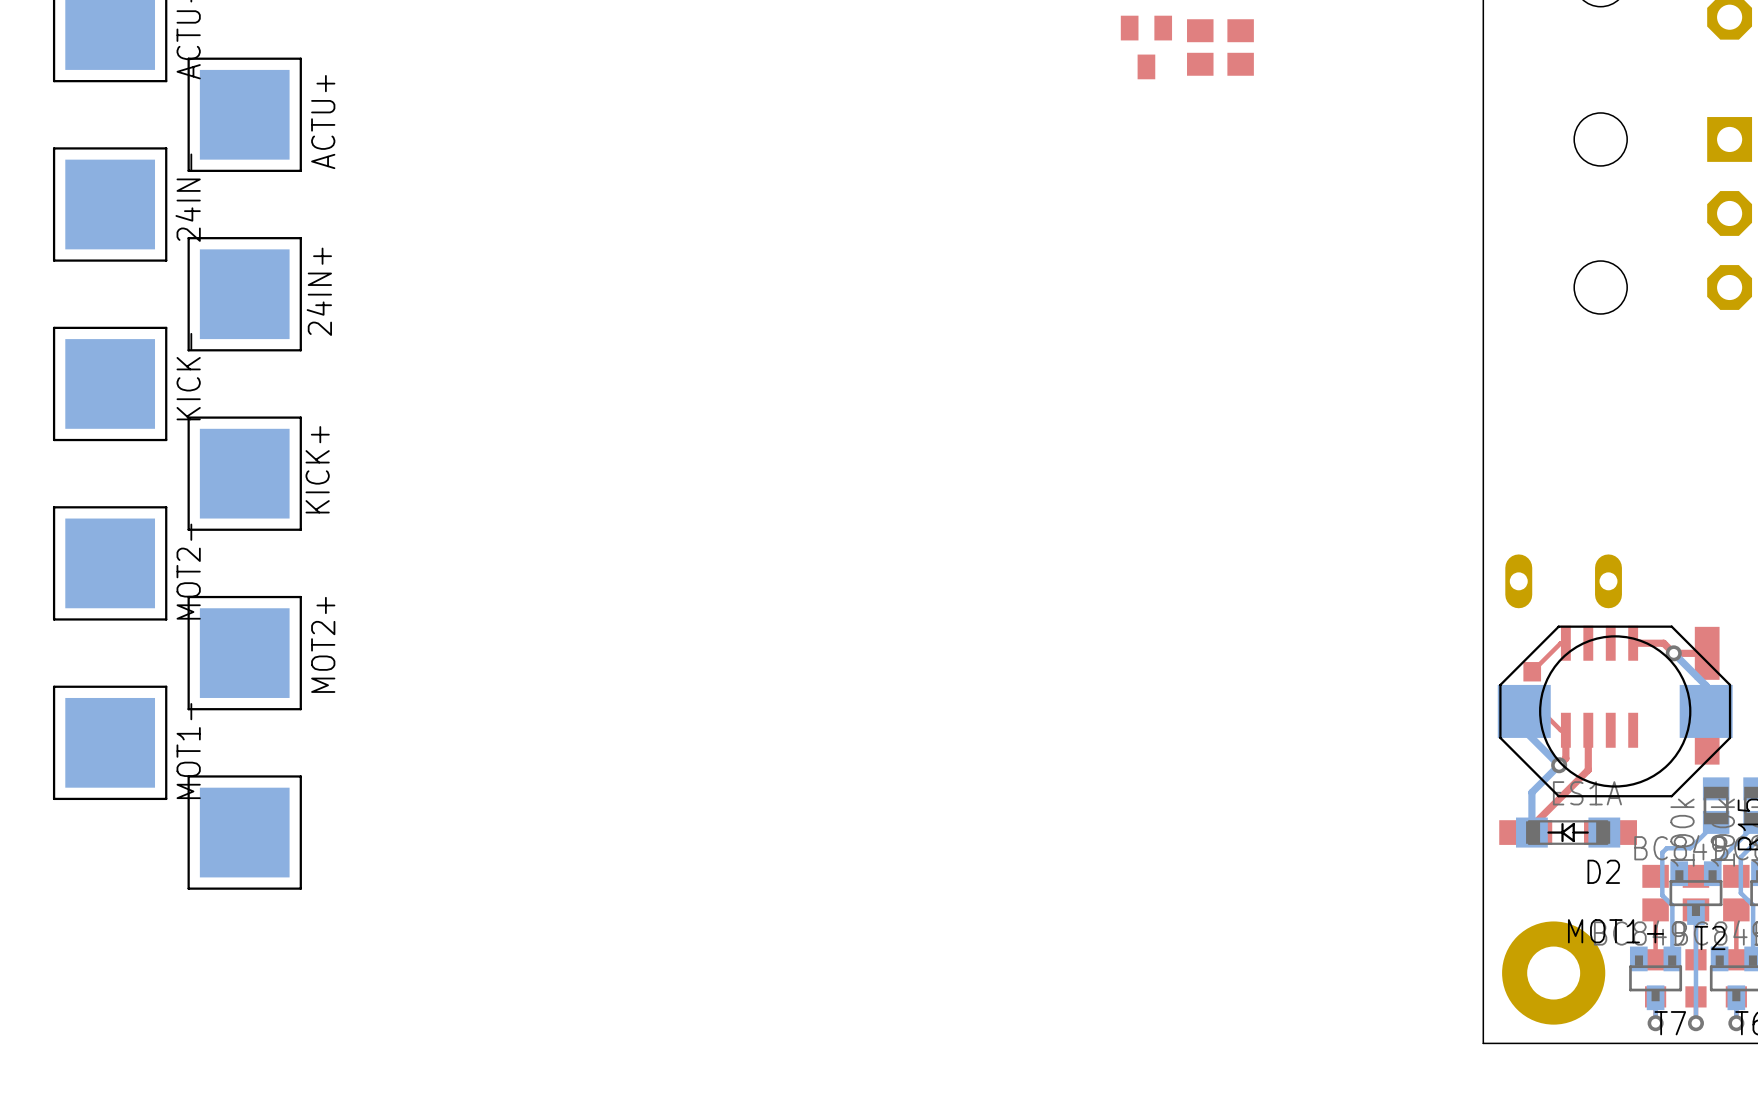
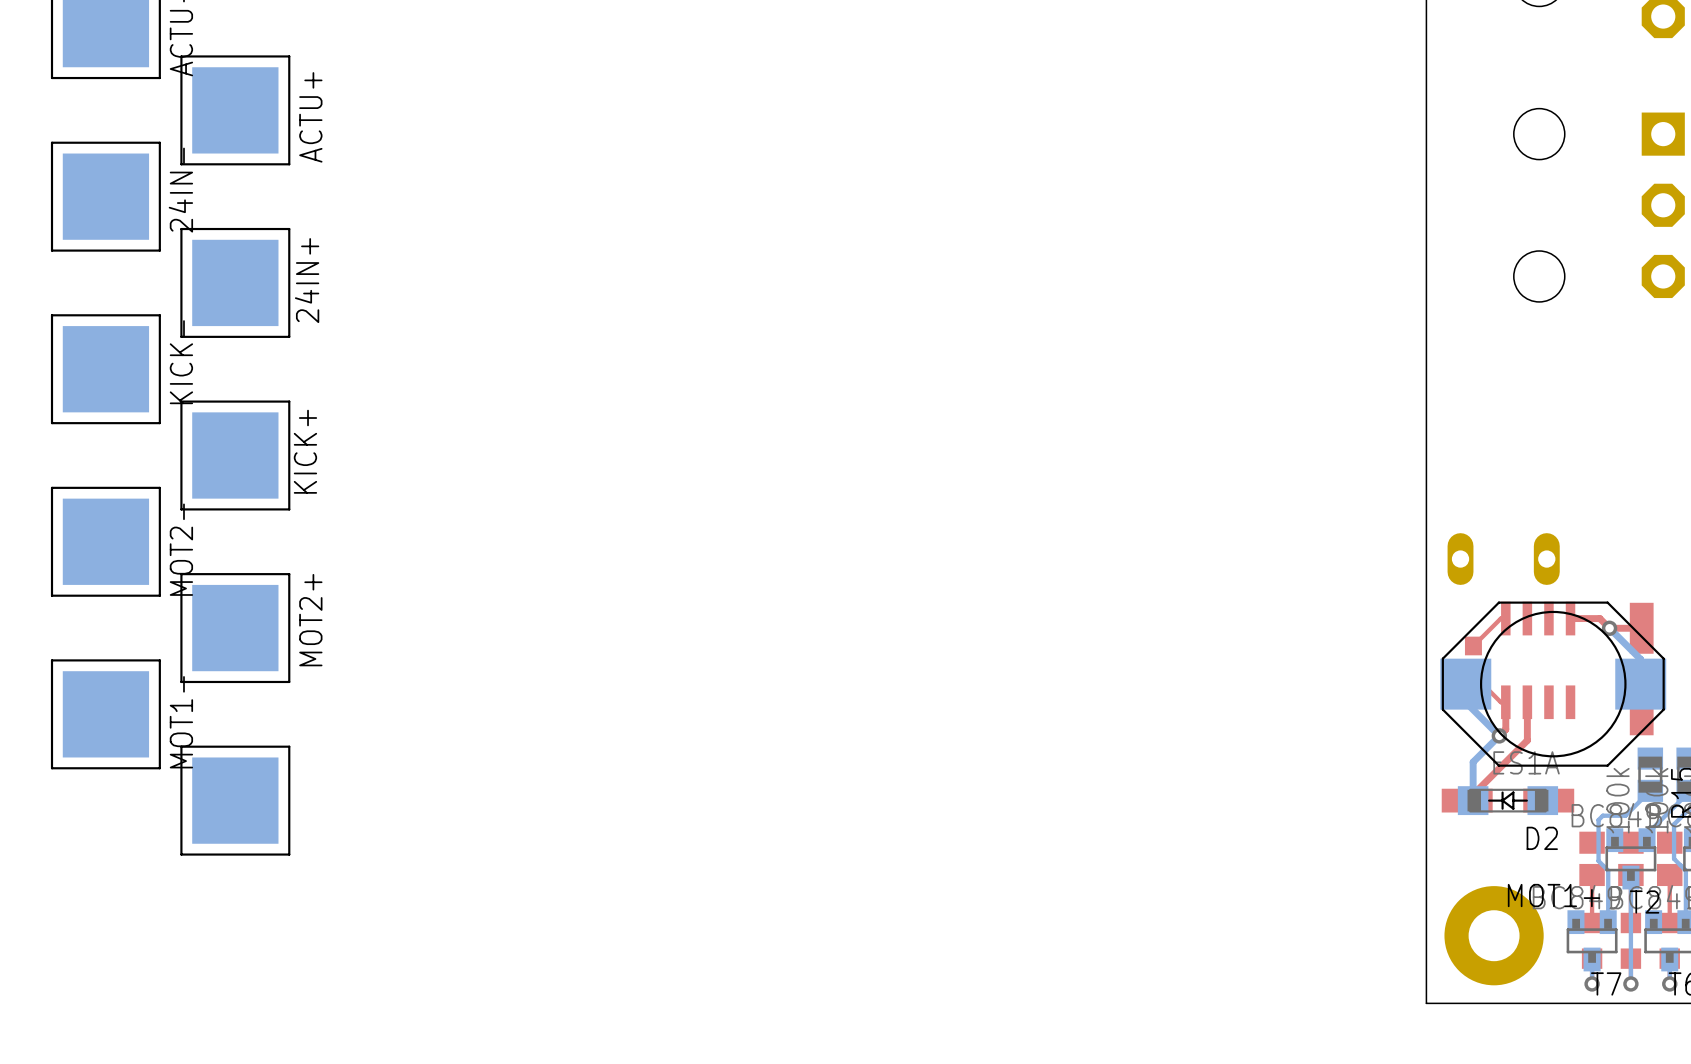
part: (1146, 47) -> none
part: (1200, 47) -> none
part: (1240, 47) -> none

